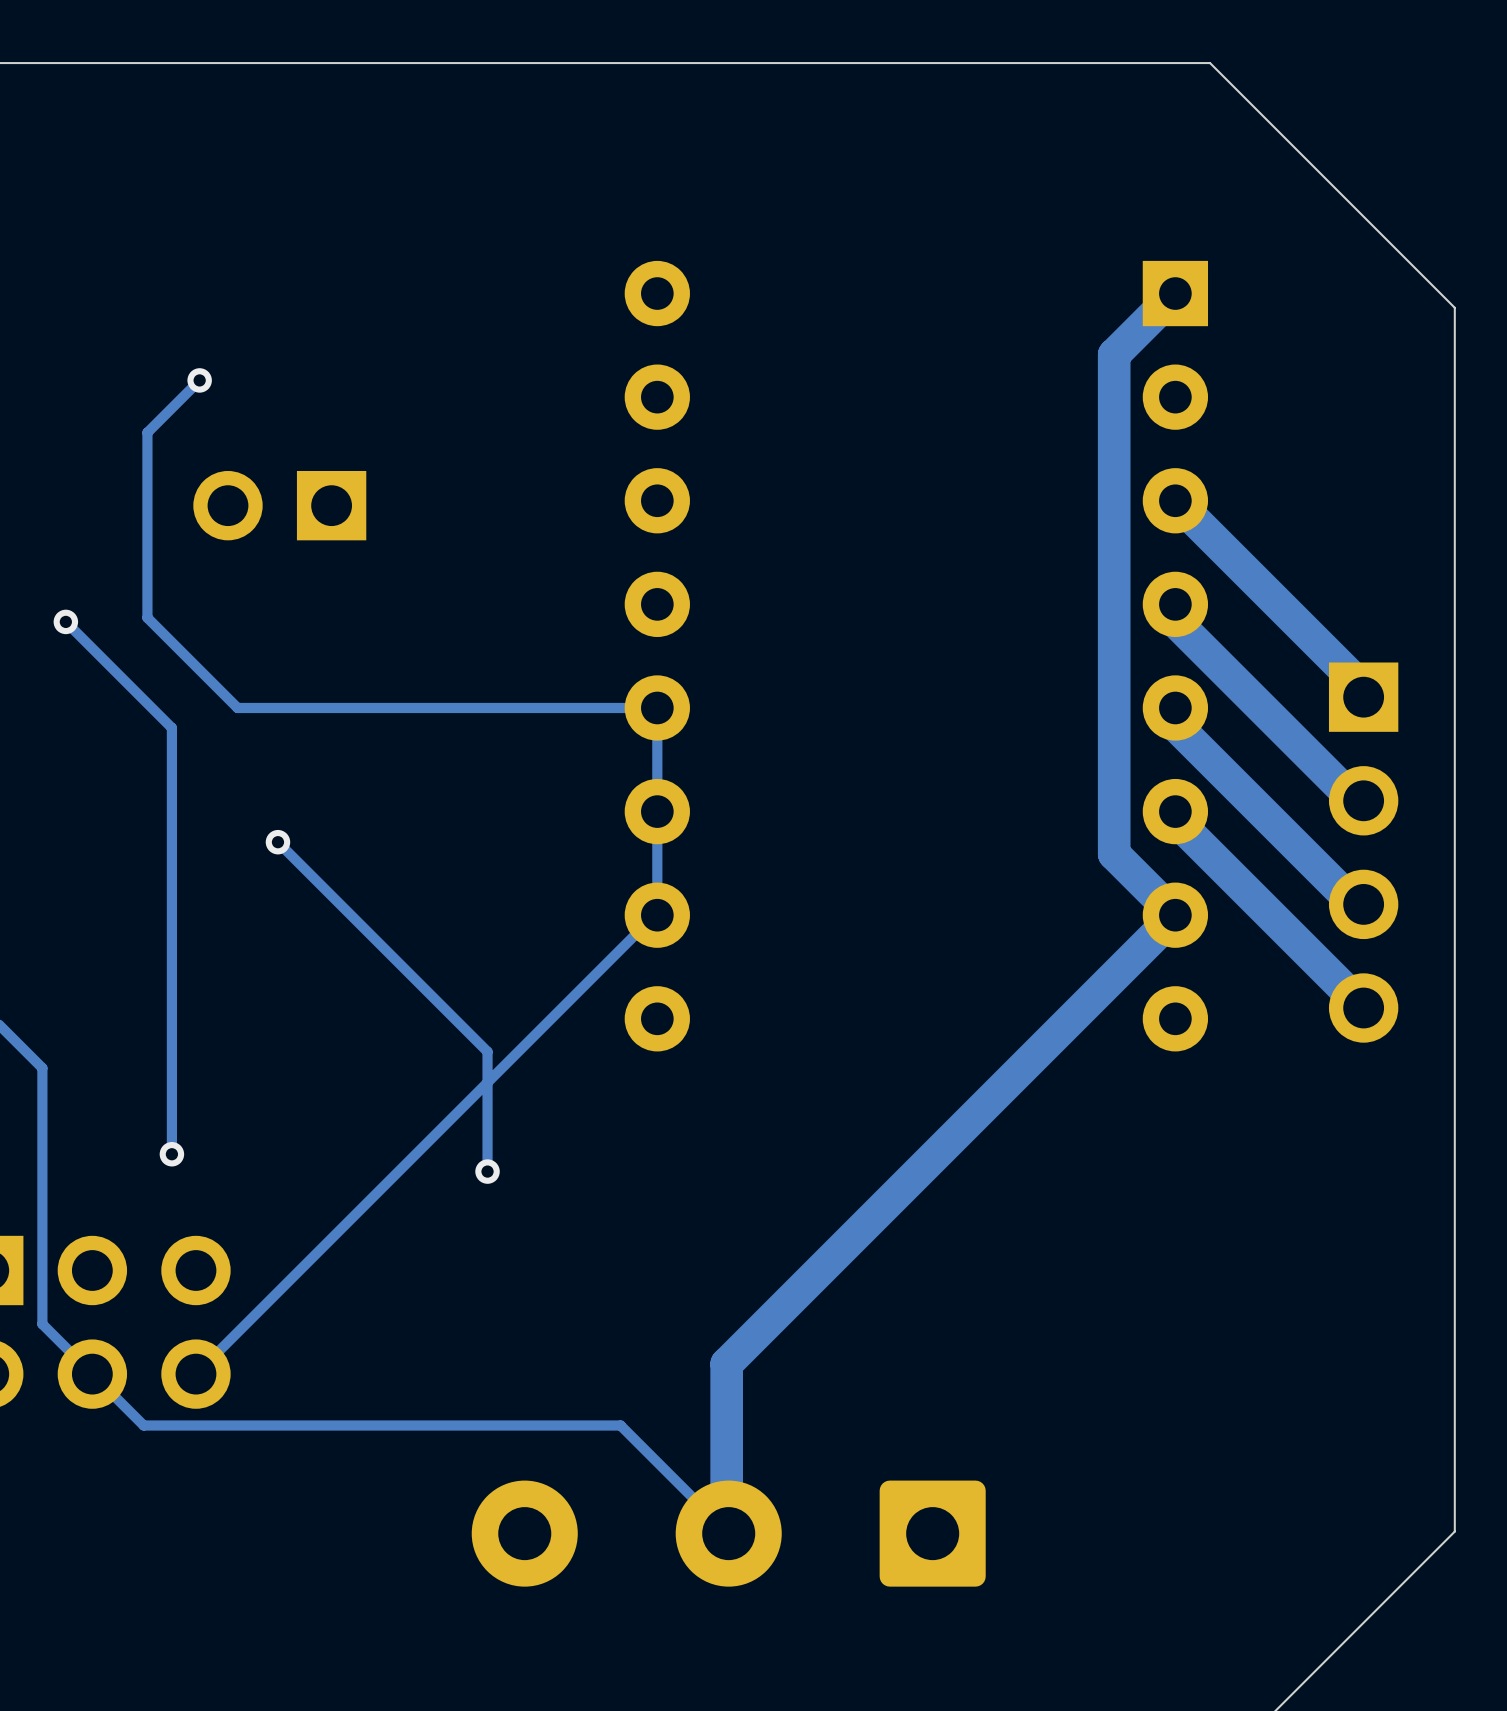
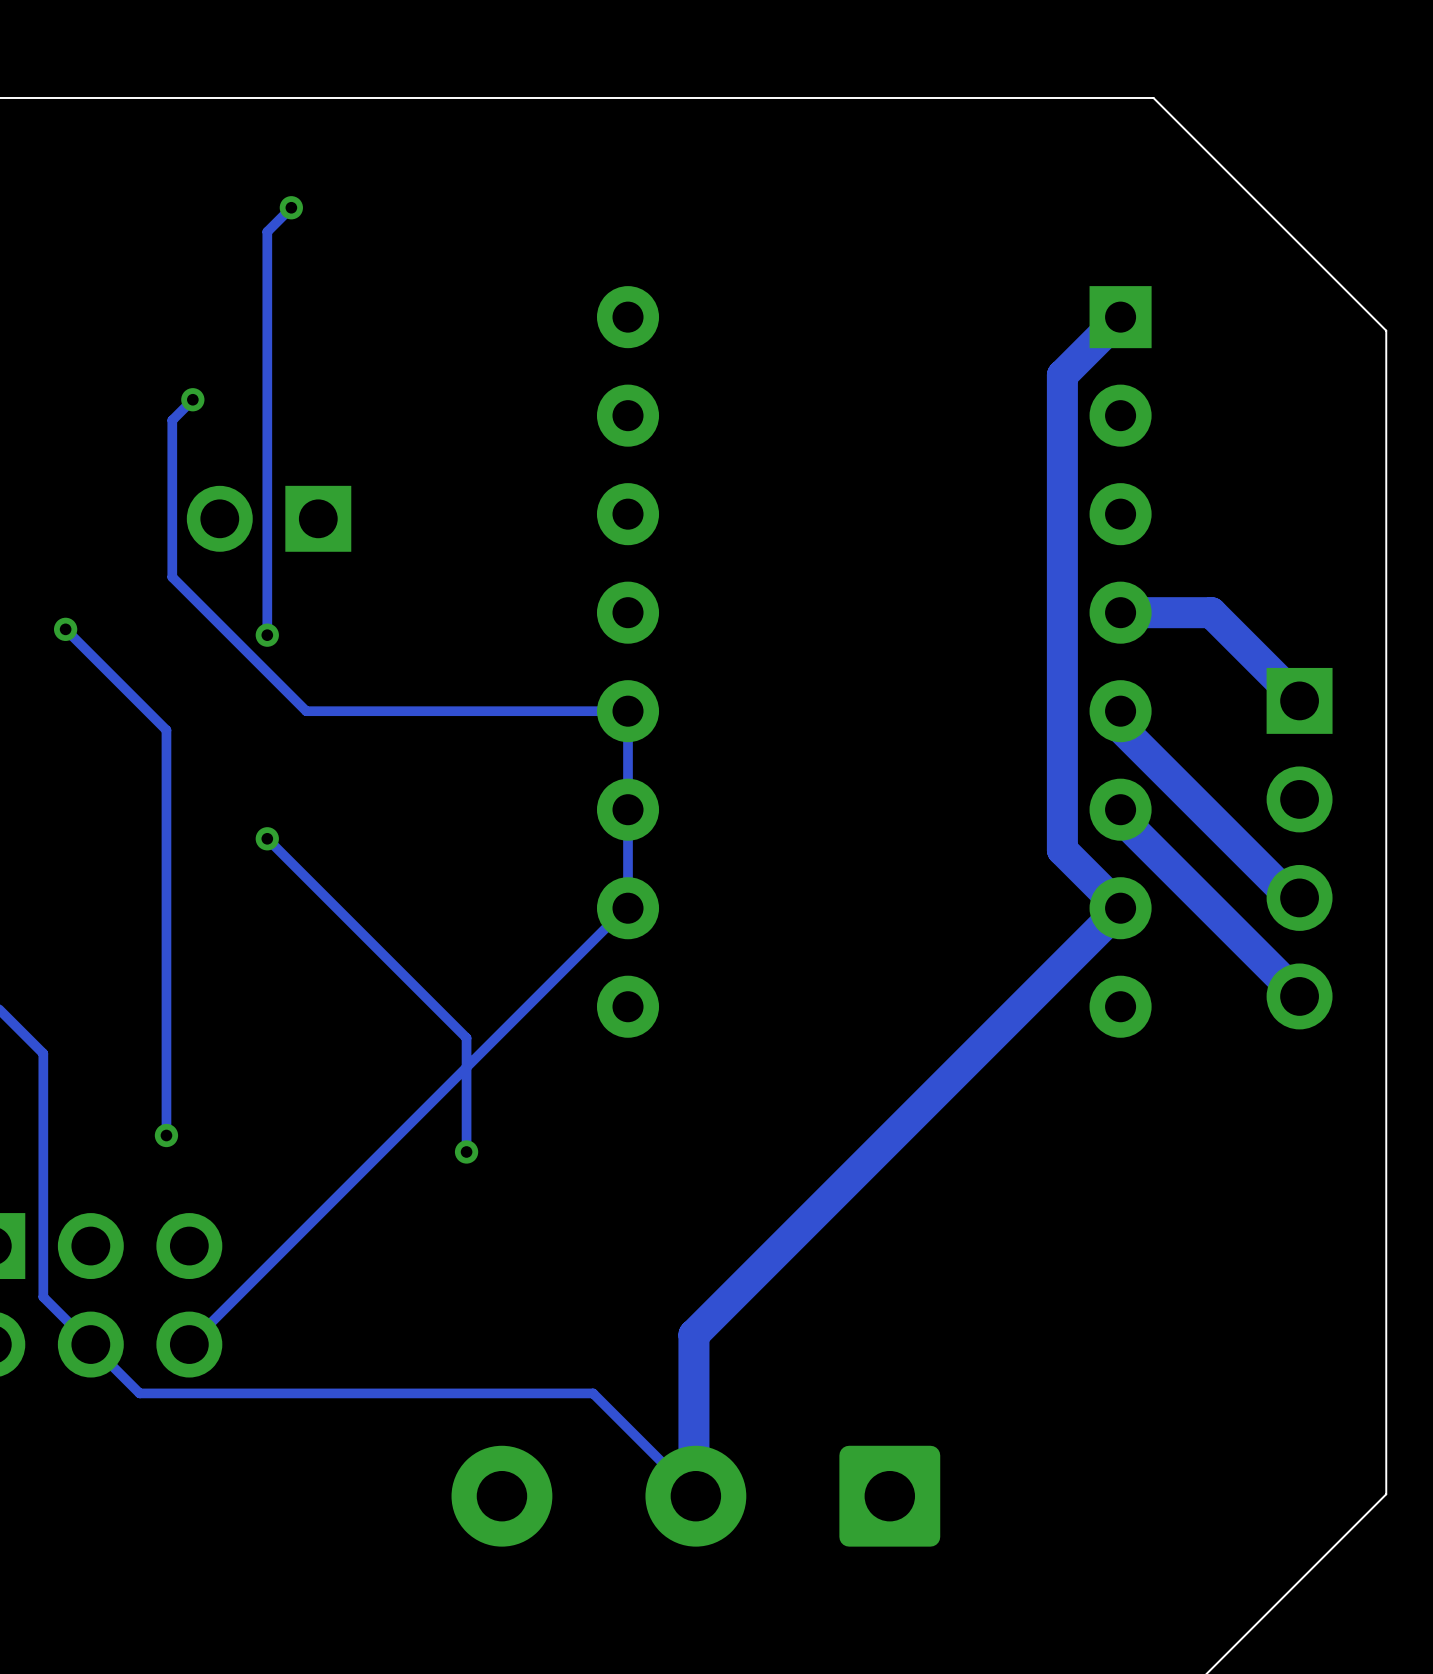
track: none -> (291, 207) (267, 231) (267, 635)
via: none -> (291, 207)
track: (178, 402) (147, 432) (147, 617) (237, 707) (318, 707) -> (172, 420) (172, 577) (306, 711)
track: (1175, 500) (1363, 689) (1363, 697) -> none
track: (1175, 604) (1175, 621) (1354, 800) (1363, 800) -> (1120, 612) (1211, 612) (1299, 700)
via: none -> (267, 635)

